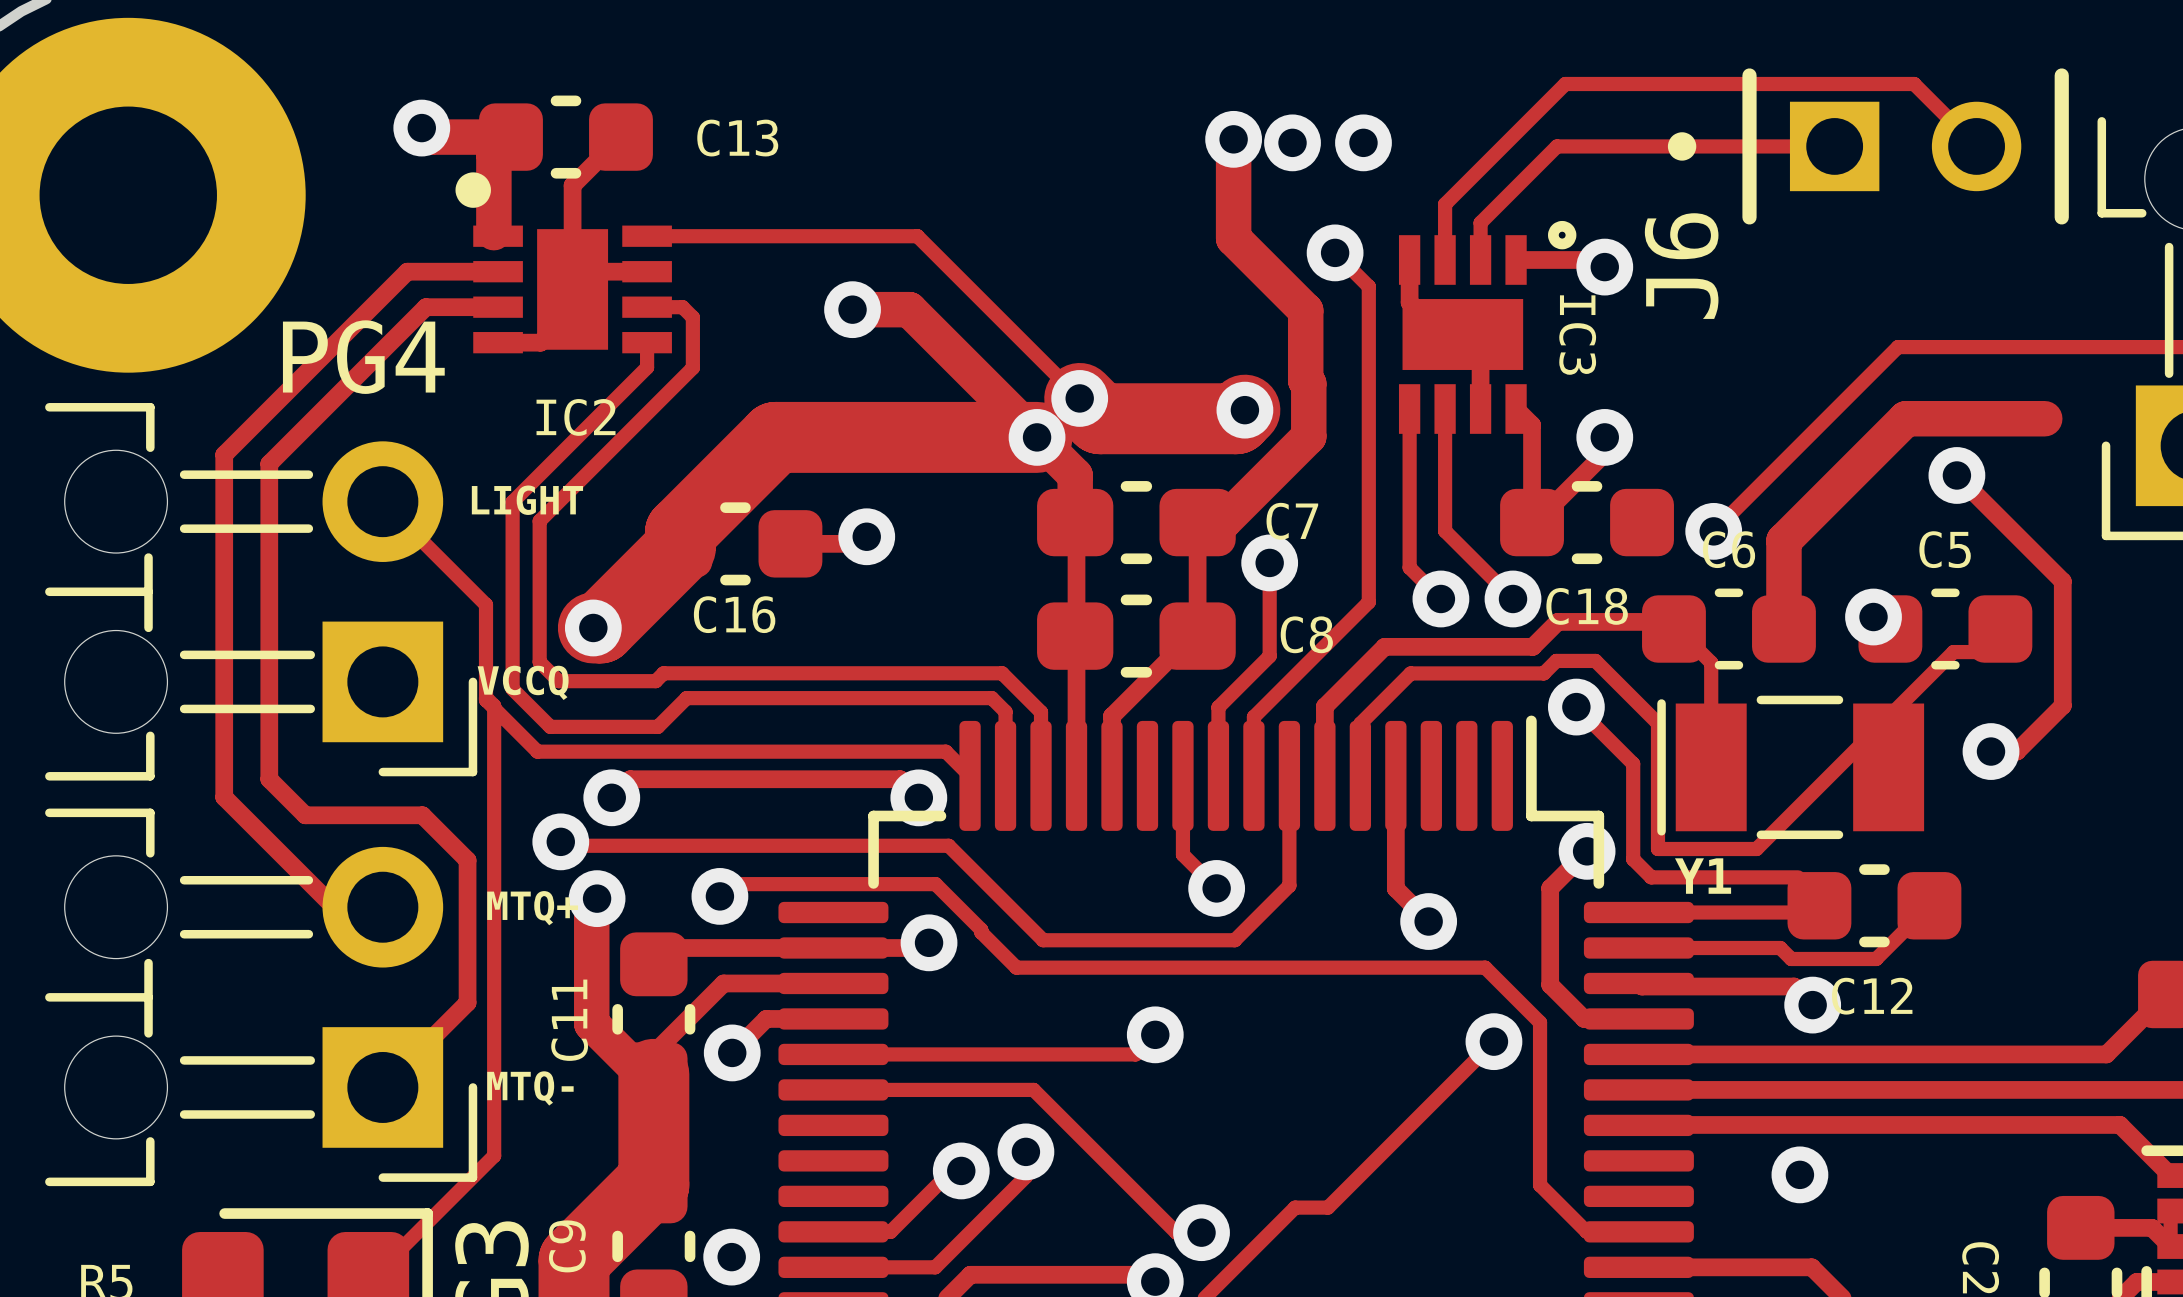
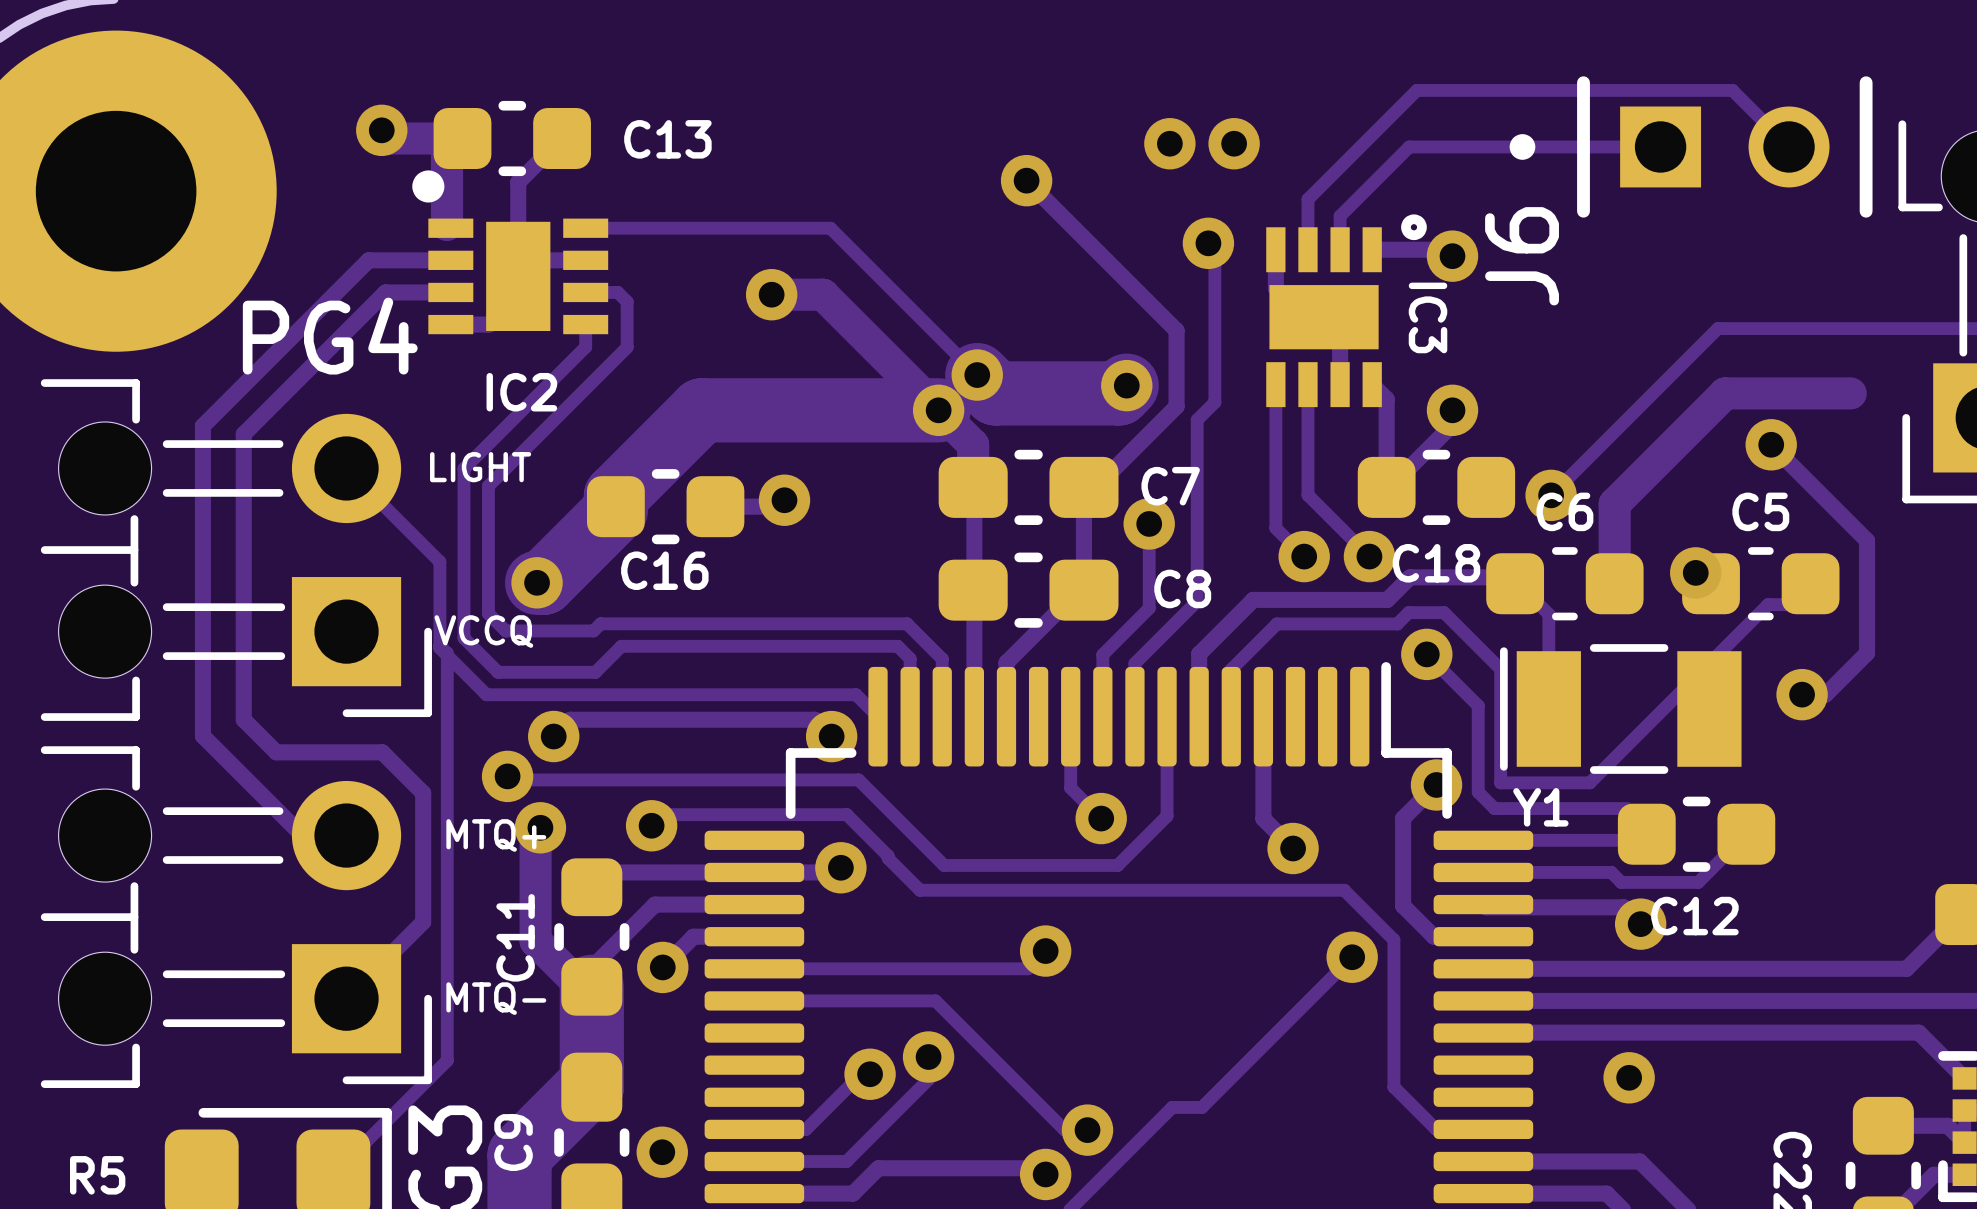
track: (1233, 139) (1233, 238) (1305, 310) (1305, 380) (1308, 383) (1308, 436) (1222, 522) (1210, 522) -> (1026, 180) (1176, 330) (1176, 406) (1095, 487)
via position: (1233, 139) -> (1026, 180)
track: (1342, 260) (1368, 286) (1368, 602) (1322, 648) -> (1214, 249) (1214, 402) (1197, 420) (1197, 601)

